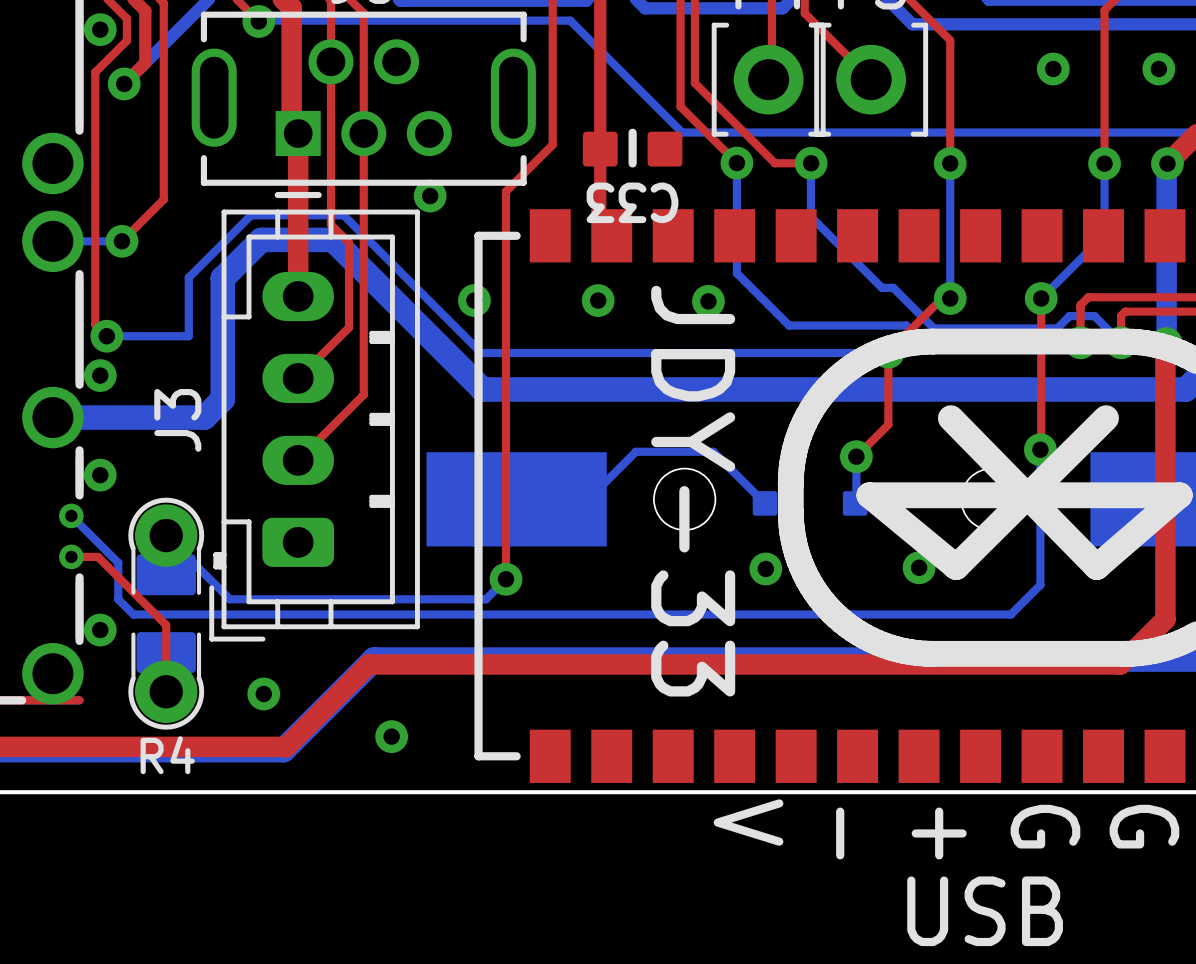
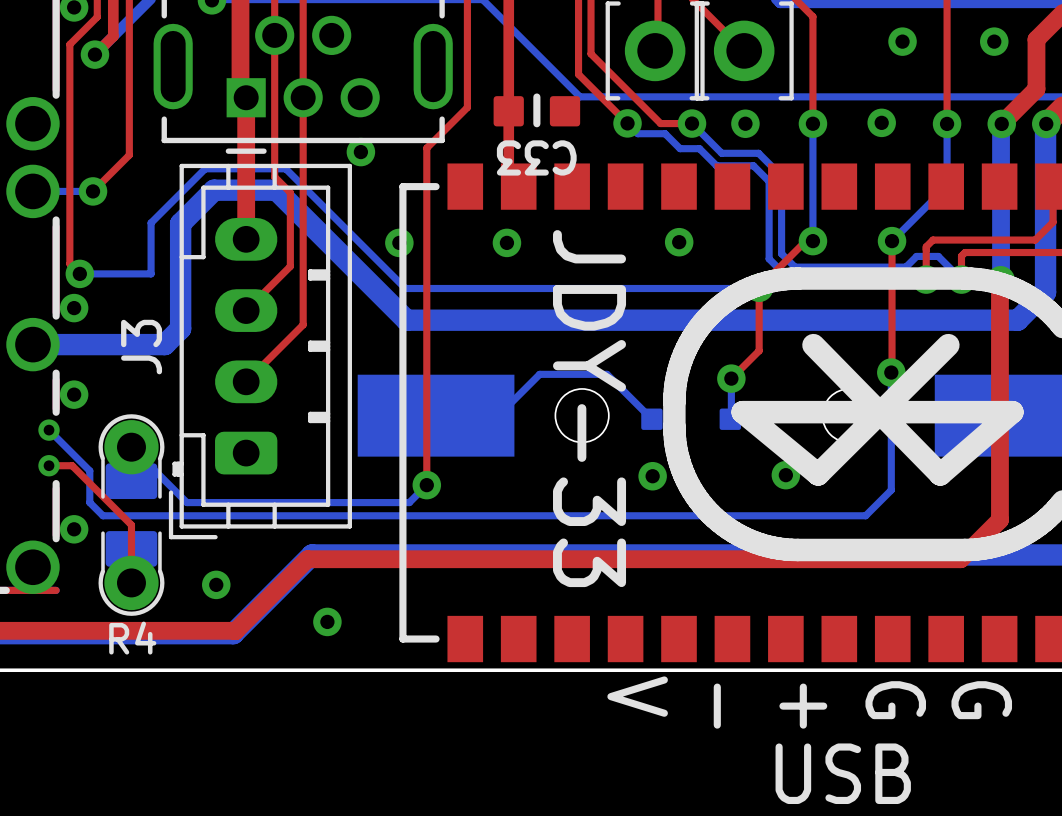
via: none -> (881, 122)
bottom track: (736, 163) (736, 273) (789, 325) (906, 325) -> (627, 123) (637, 133) (665, 133) (680, 148) (699, 148) (716, 165) (753, 165) (769, 181) (769, 258) (774, 264)
bottom track: (810, 163) (810, 216) (881, 287) (893, 287) (933, 328) -> (692, 123) (721, 153) (758, 153) (781, 176) (781, 253) (794, 267) (798, 267)
via: none -> (745, 123)
via position: (708, 301) -> (679, 242)

